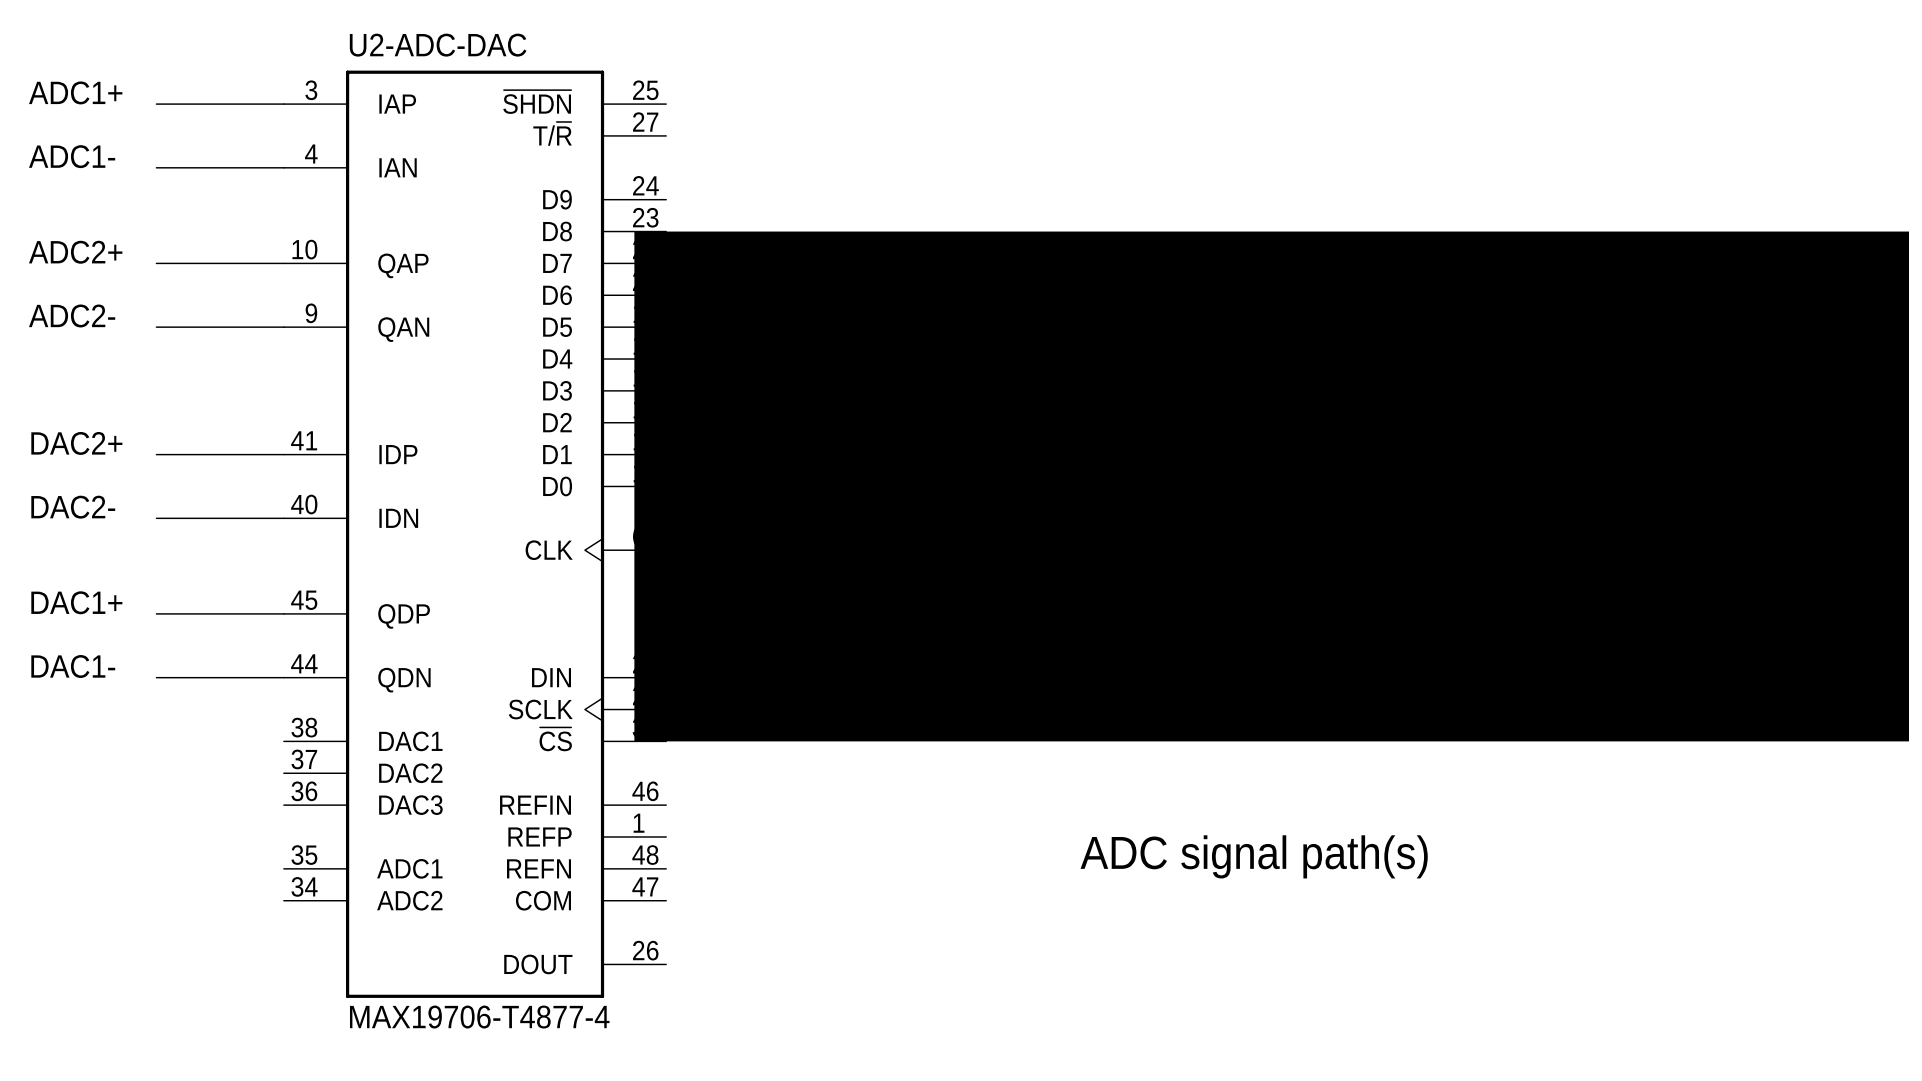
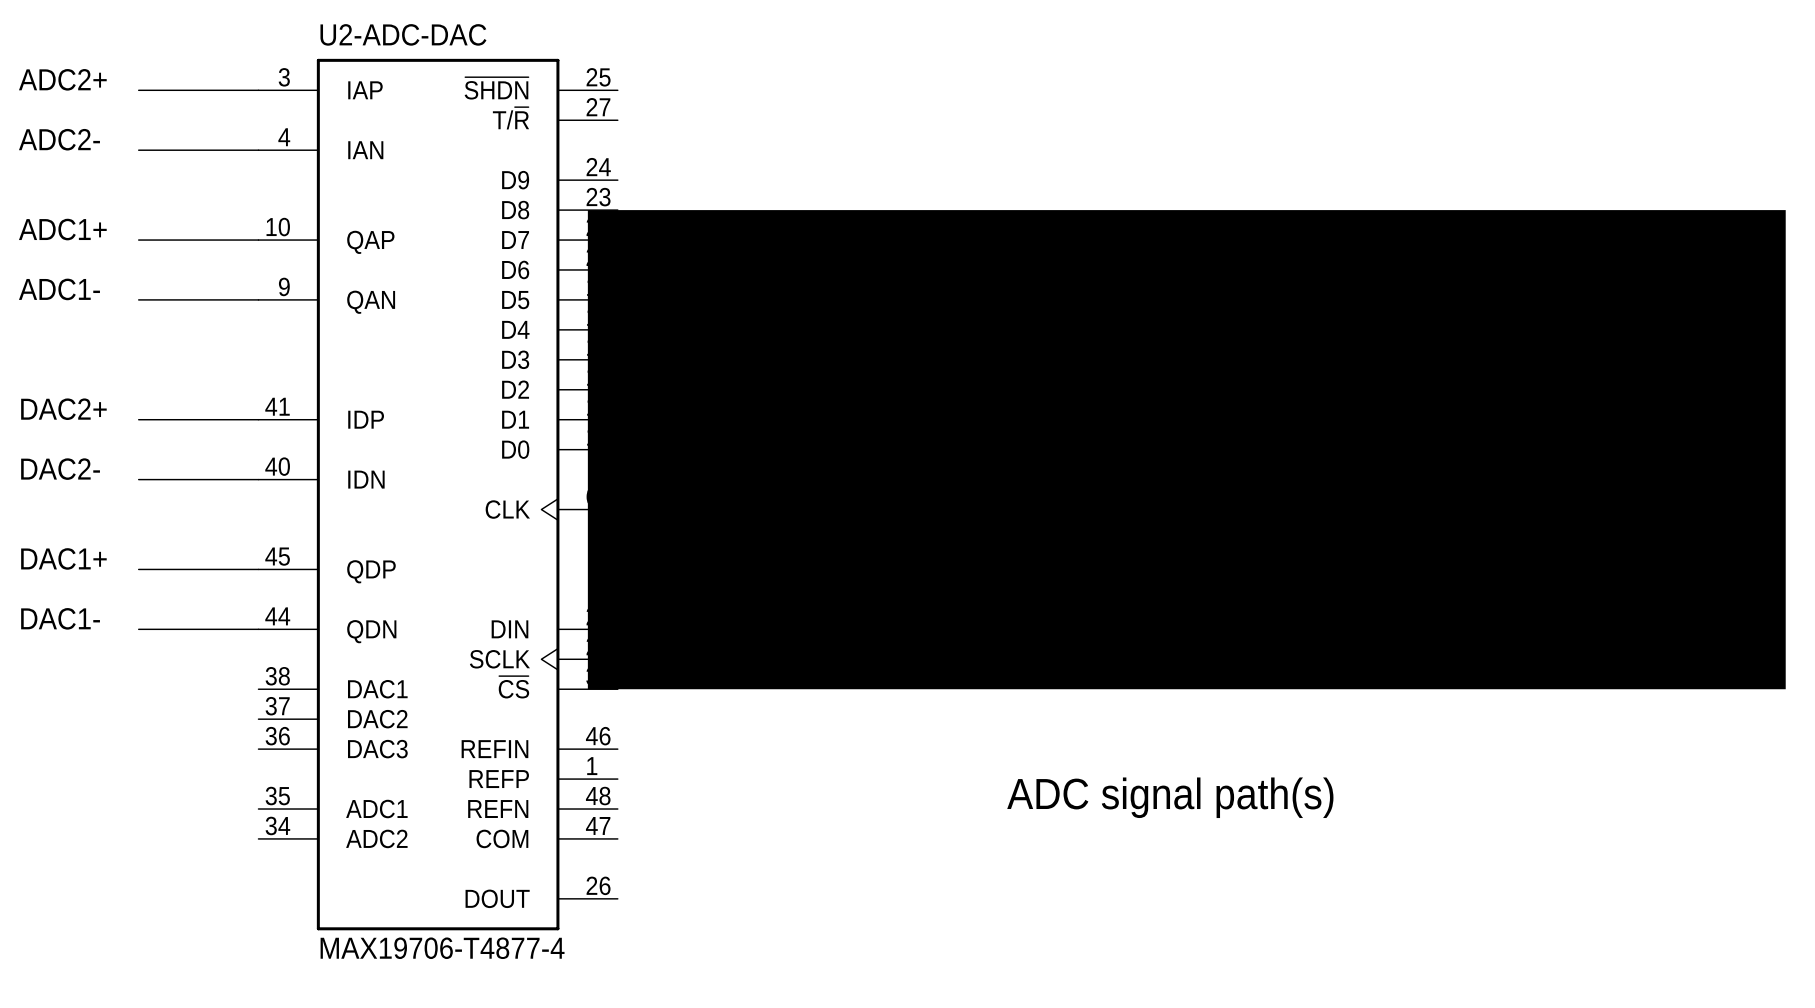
label: ADC1+ (75, 92) -> ADC2+ (62, 79)
label: ADC1- (72, 156) -> ADC2- (59, 139)
label: ADC2+ (75, 252) -> ADC1+ (62, 229)
label: ADC2- (72, 315) -> ADC1- (59, 289)

